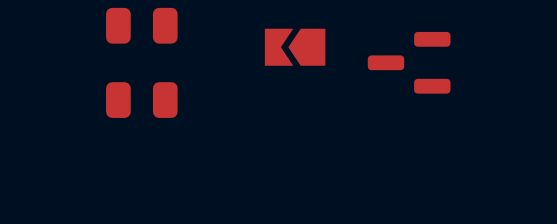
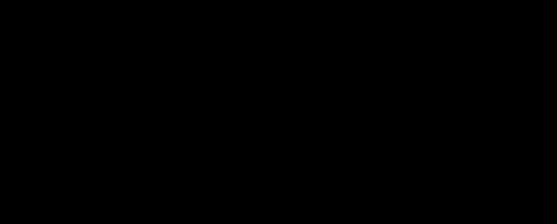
part: (141, 25) -> none
part: (295, 47) -> none
part: (409, 62) -> none
part: (141, 100) -> none

